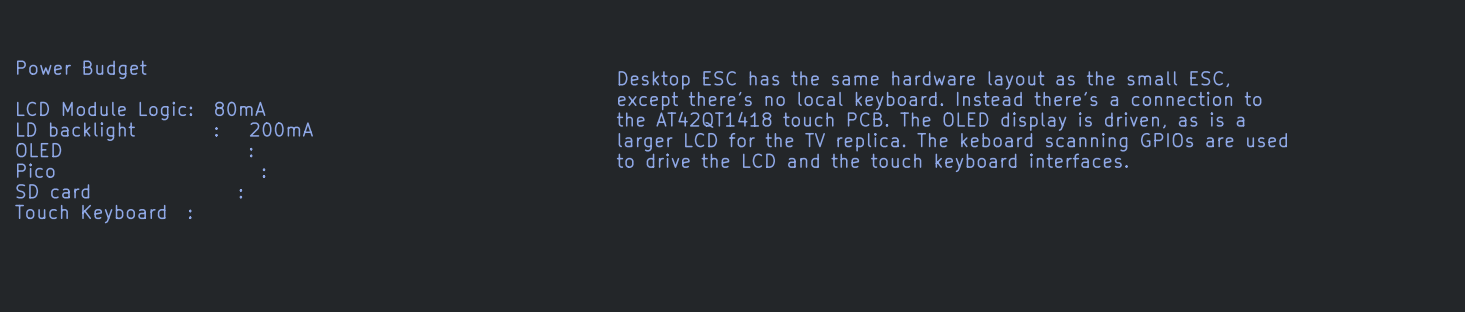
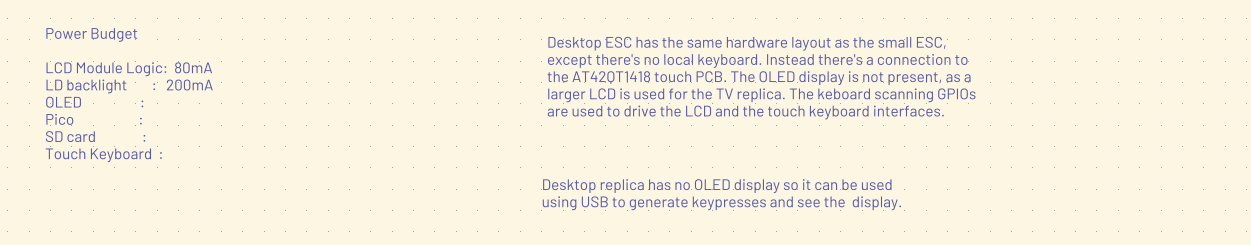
text: the AT42QT1418 touch PCB. The OLED display is driven, as is a (930, 121) -> the AT42QT1418 touch PCB. The OLED display is not present, as a (759, 78)
text: larger LCD for the TV replica. The keboard scanning GPIOs are used (952, 142) -> larger LCD is used for the TV replica. The keboard scanning GPIOs (761, 95)
text: to drive the LCD and the touch keyboard interfaces. (872, 162) -> are used to drive the LCD and the touch keyboard interfaces. (745, 112)
text: none -> Desktop replica has no OLED display so it can be used (717, 186)
text: none -> using USB to generate keypresses and see the display. (721, 203)

